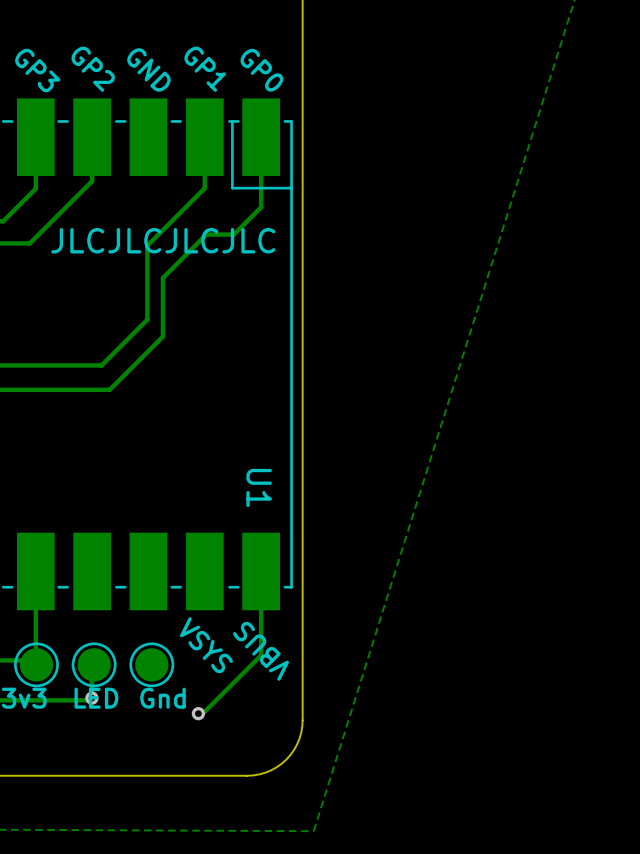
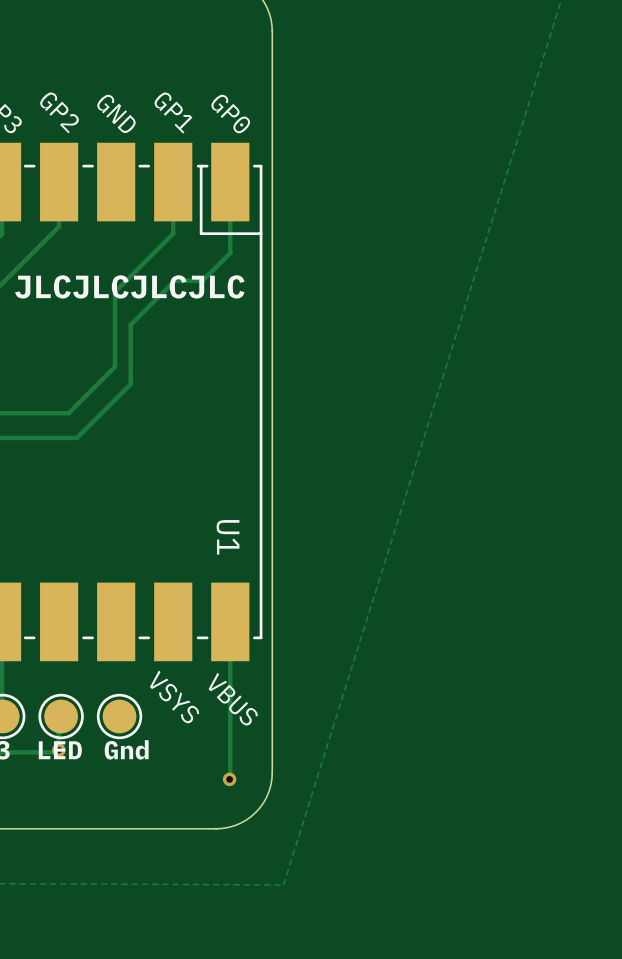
U1 text: none -> VBUS (233, 699)
text: VBUS (261, 651) -> none
track: (261, 655) (202, 713) (198, 713) -> (230, 706) (229, 779)
via position: (198, 713) -> (229, 779)

